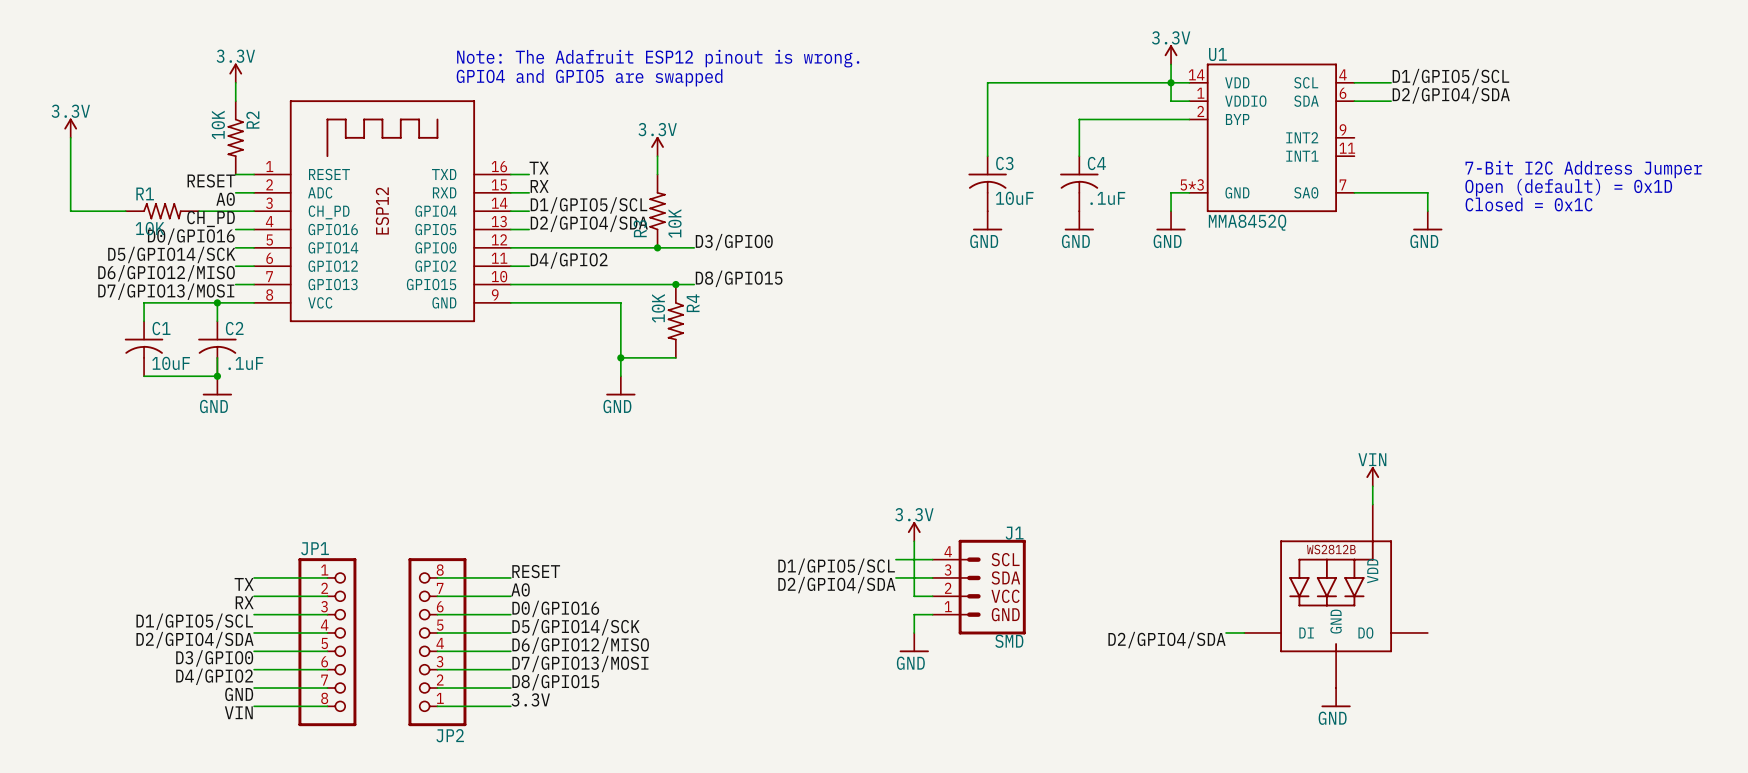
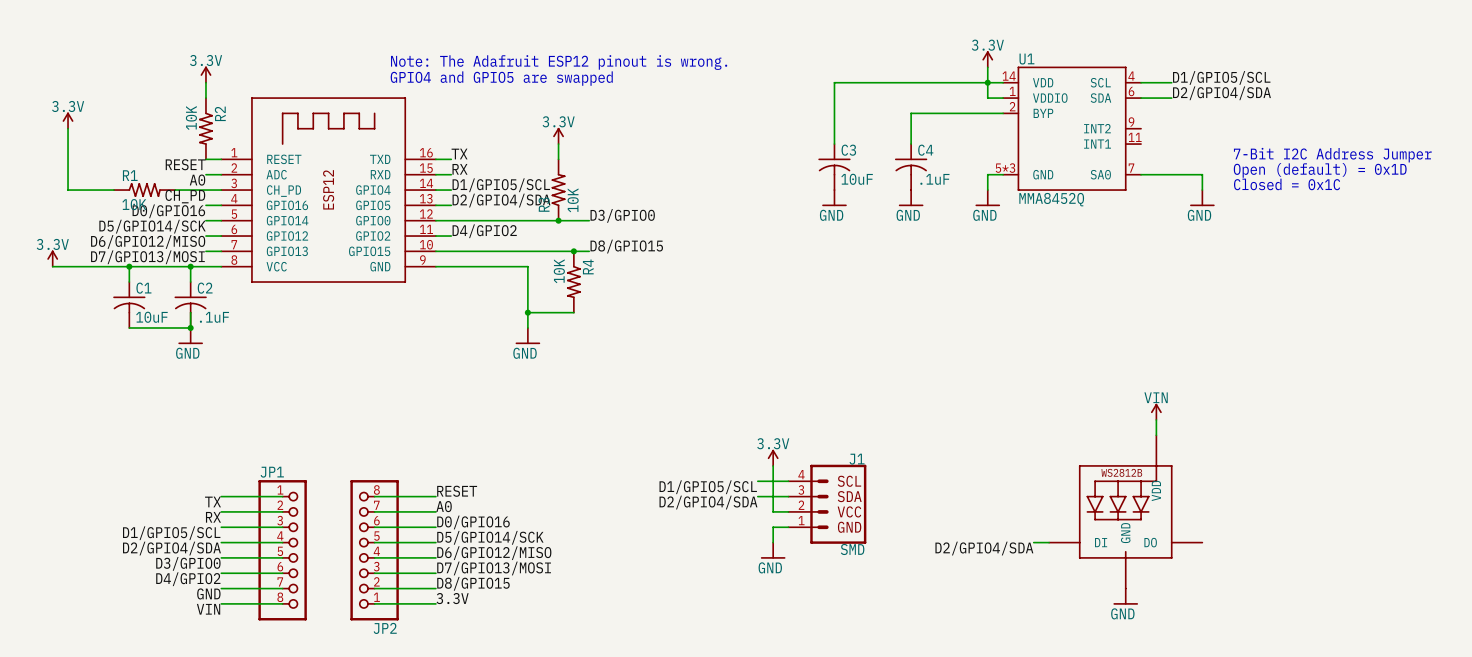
power symbol: none -> 3.3V (52, 258)
wire: none -> (52, 266) (129, 266)
junction: none -> (129, 266)

